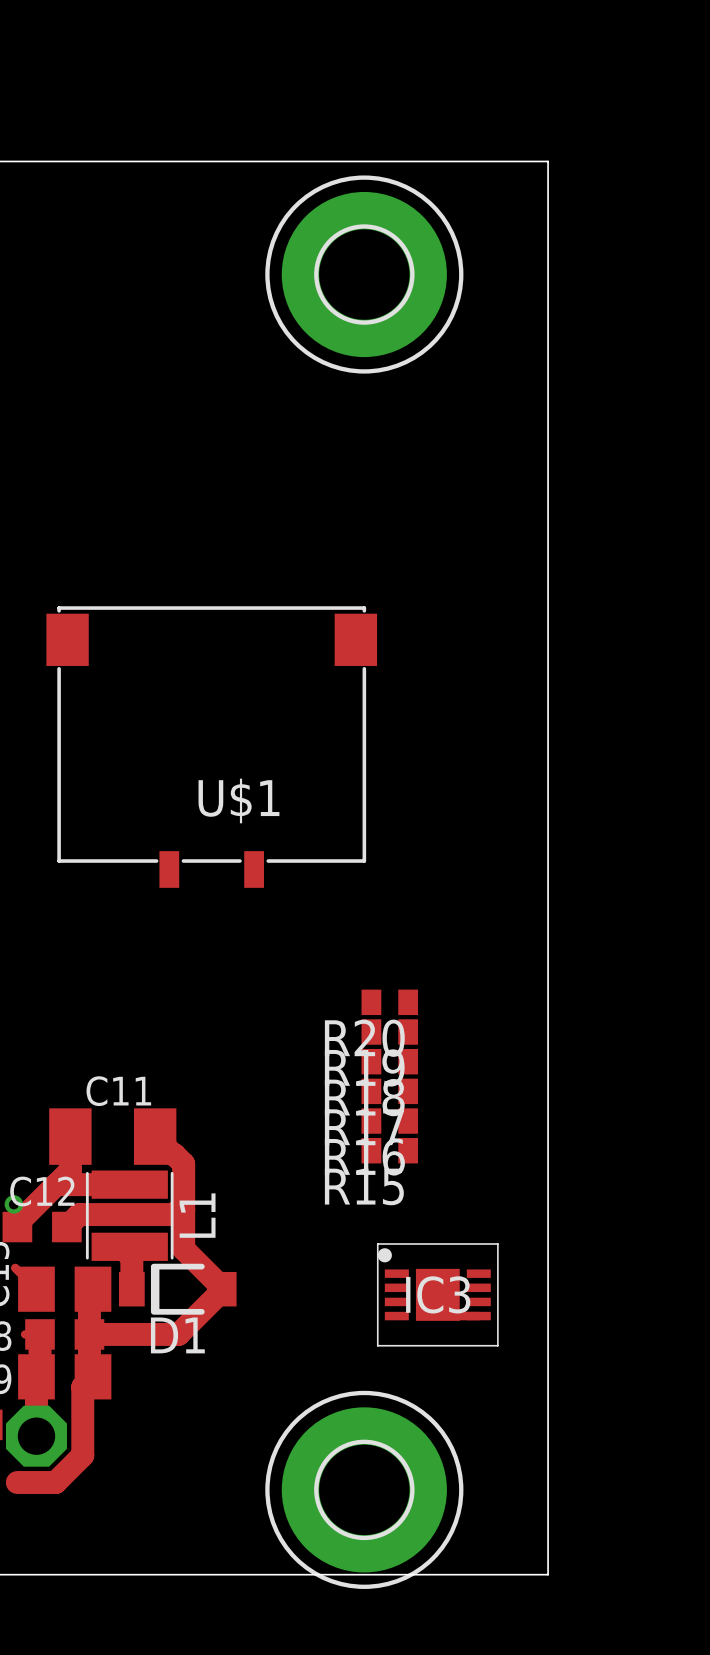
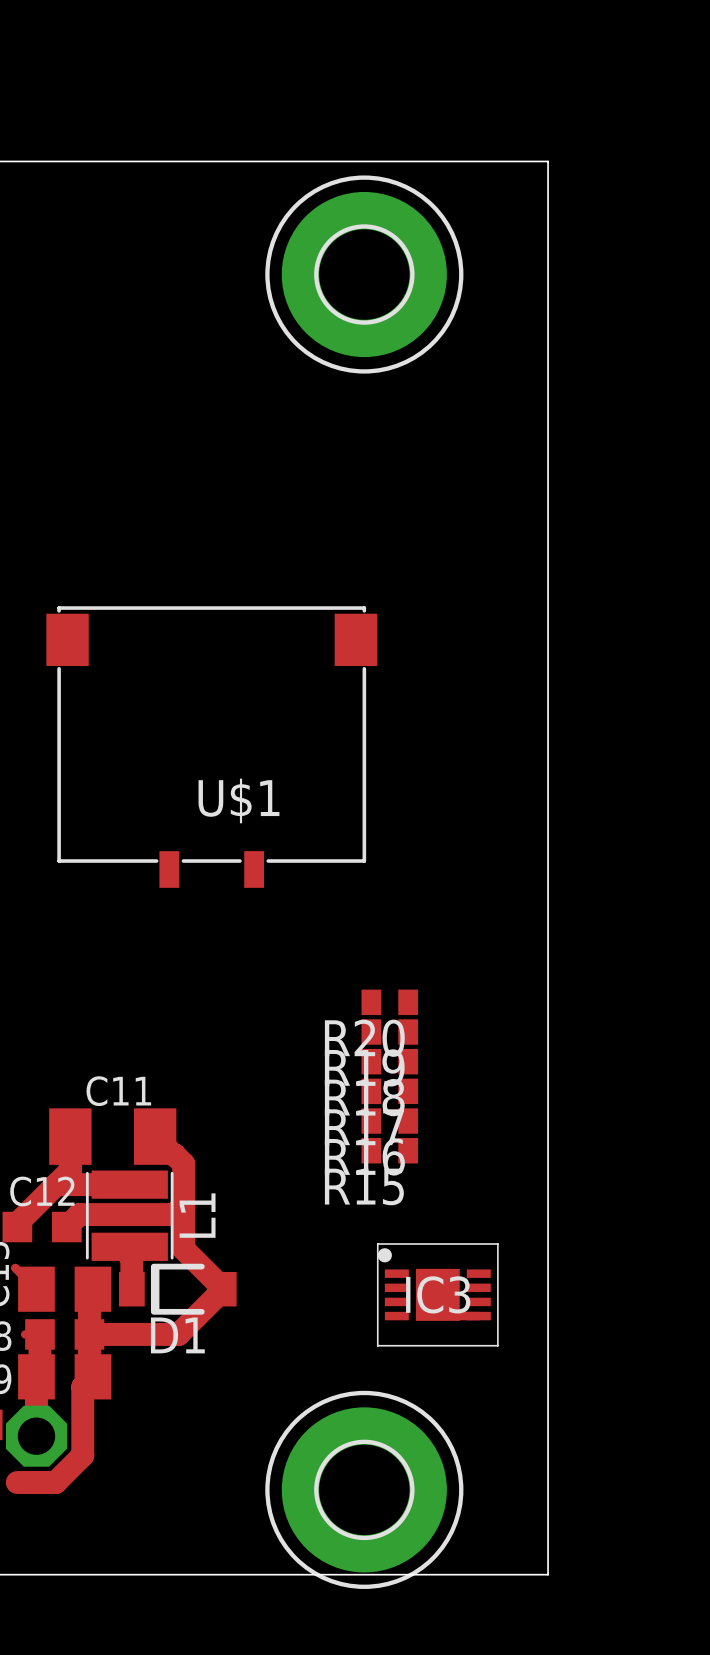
via: (13, 1204) -> none

